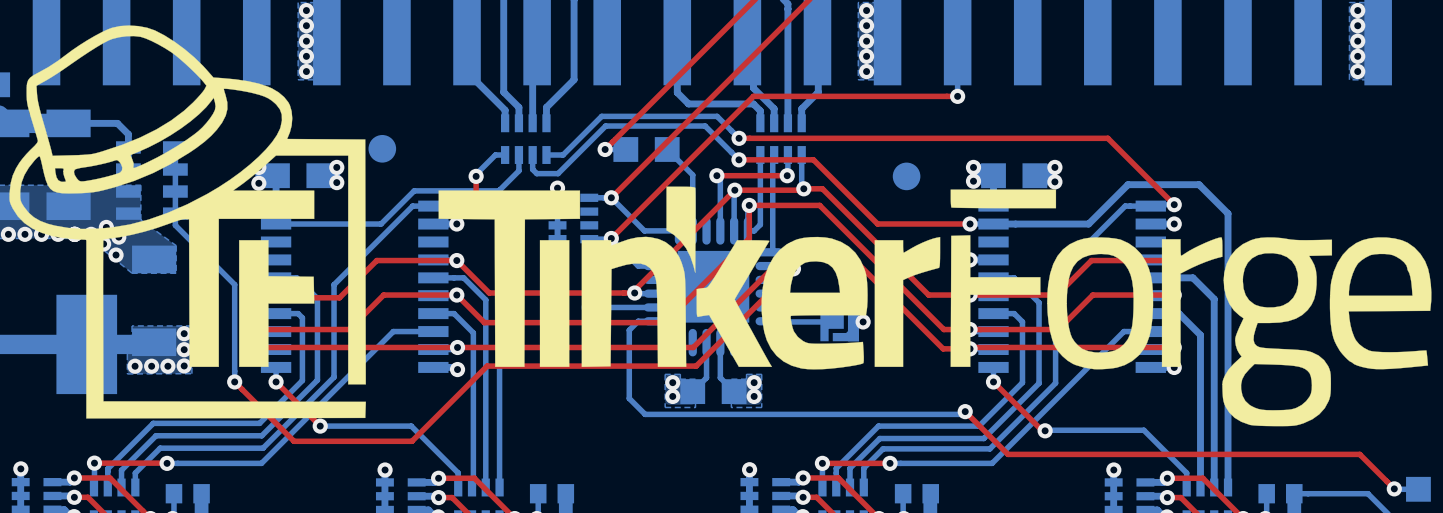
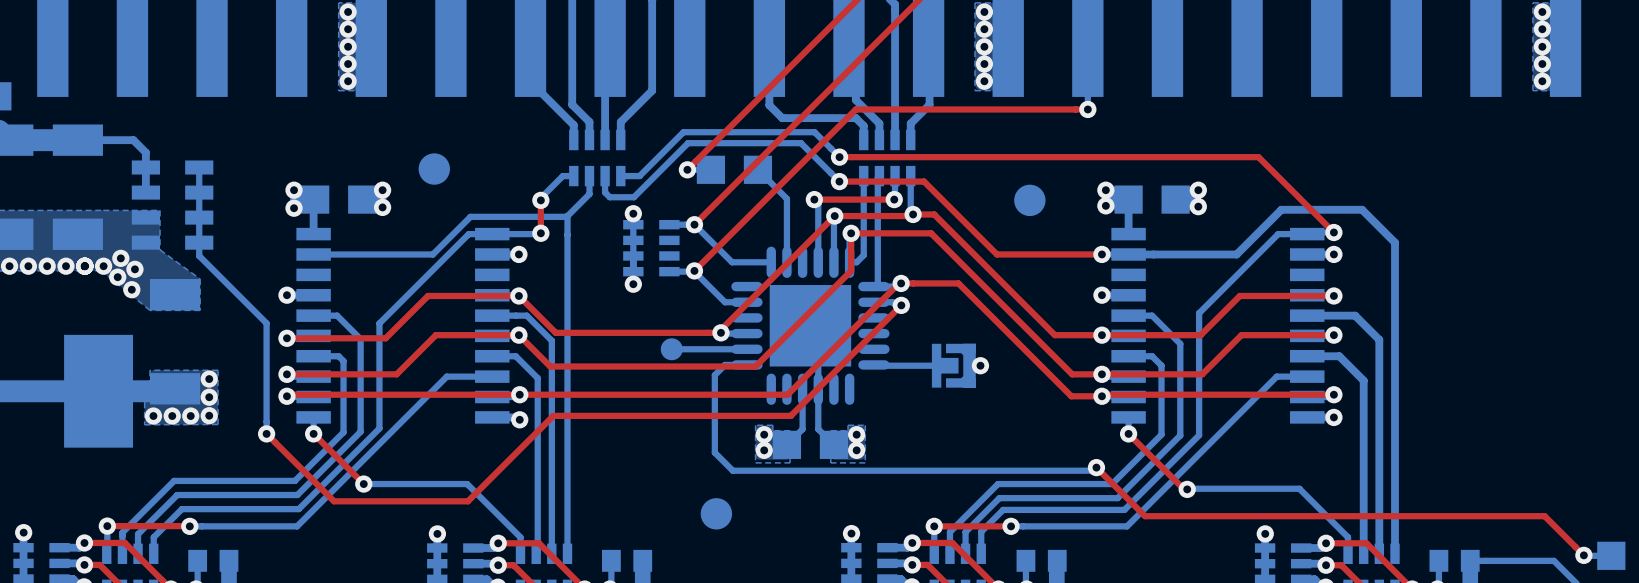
drawing: [9, 25, 1432, 427] -> none
part: none -> (716, 513)

